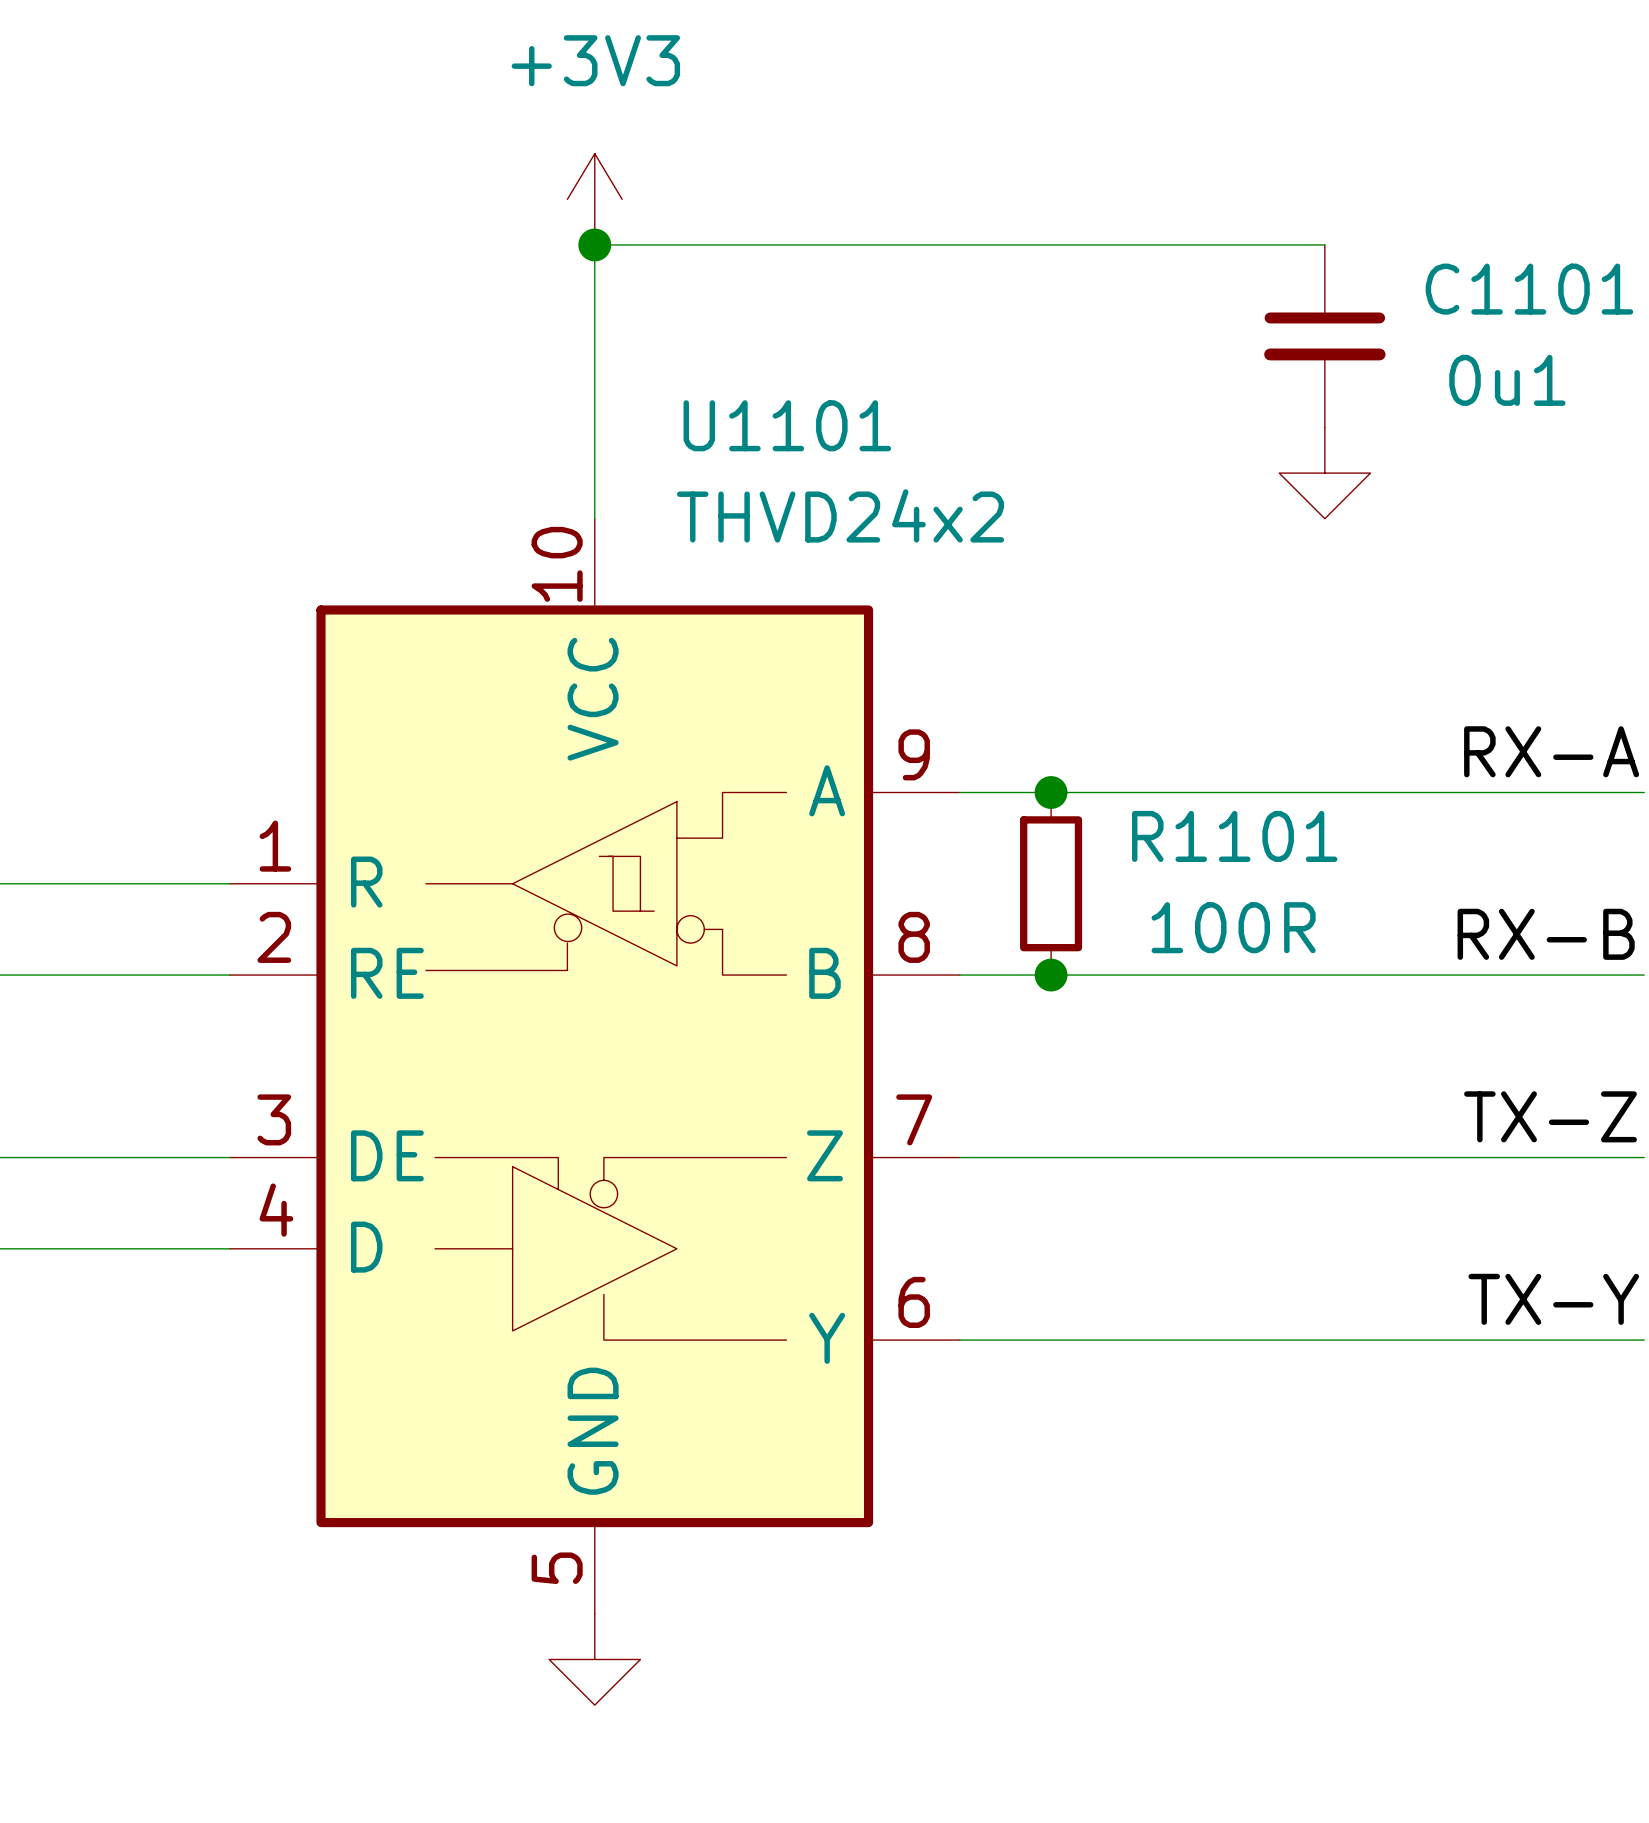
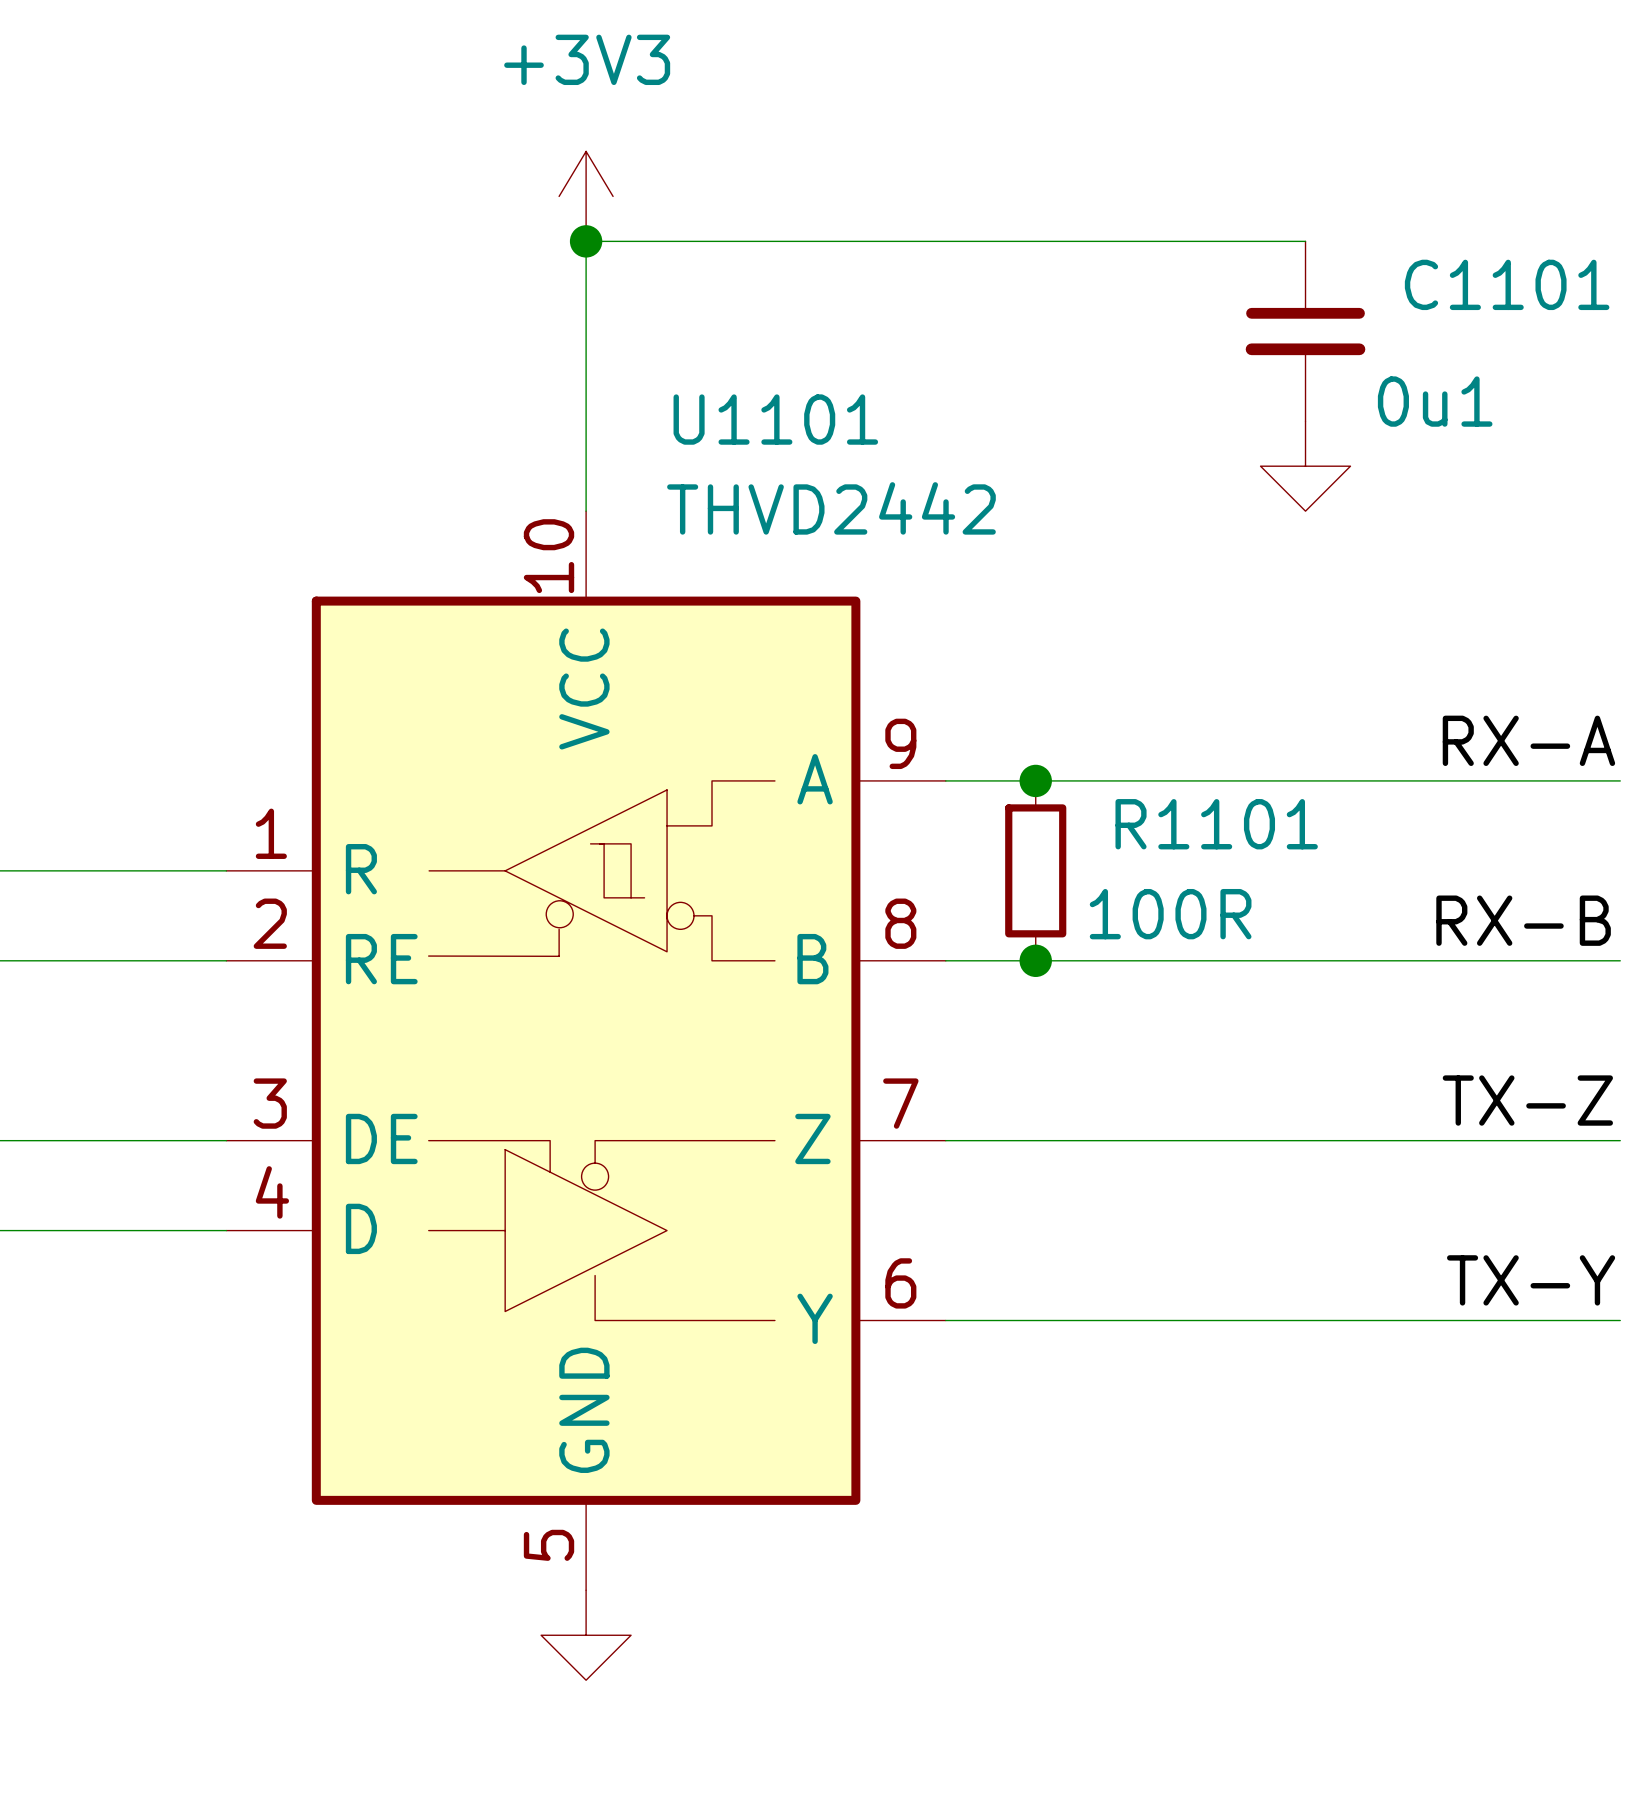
C1101 value position: 0u1 (1507, 380) -> 0u1 (1435, 401)
U1101 value: THVD24x2 (840, 515) -> THVD2442 (831, 508)
U1101 symbol: [229, 518, 960, 1614] -> [226, 511, 946, 1591]
R1101 value position: 100R (1233, 927) -> 100R (1170, 914)

